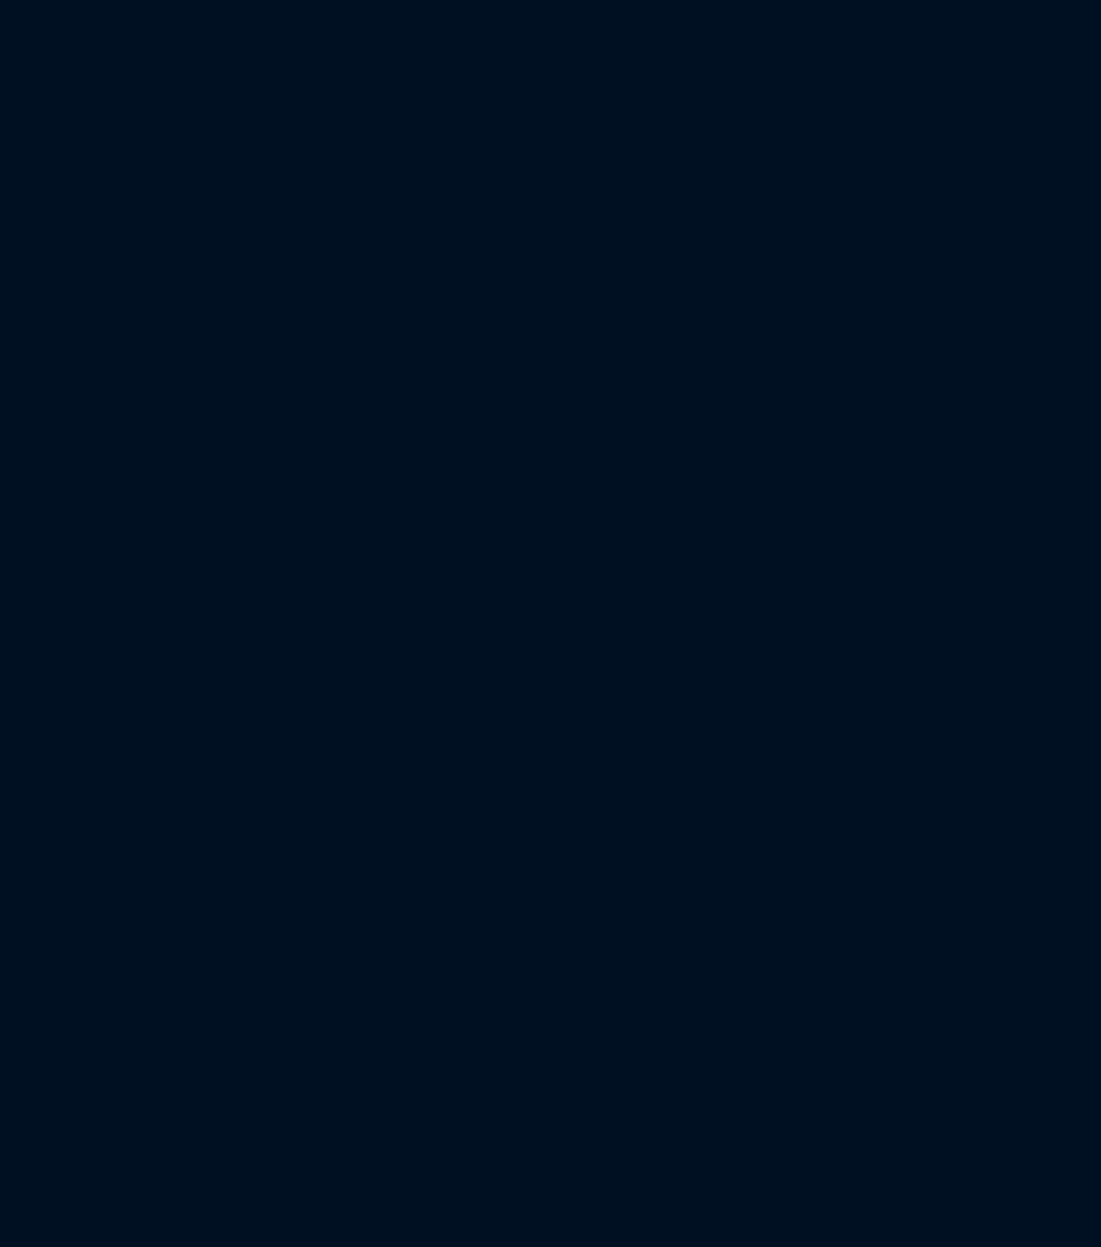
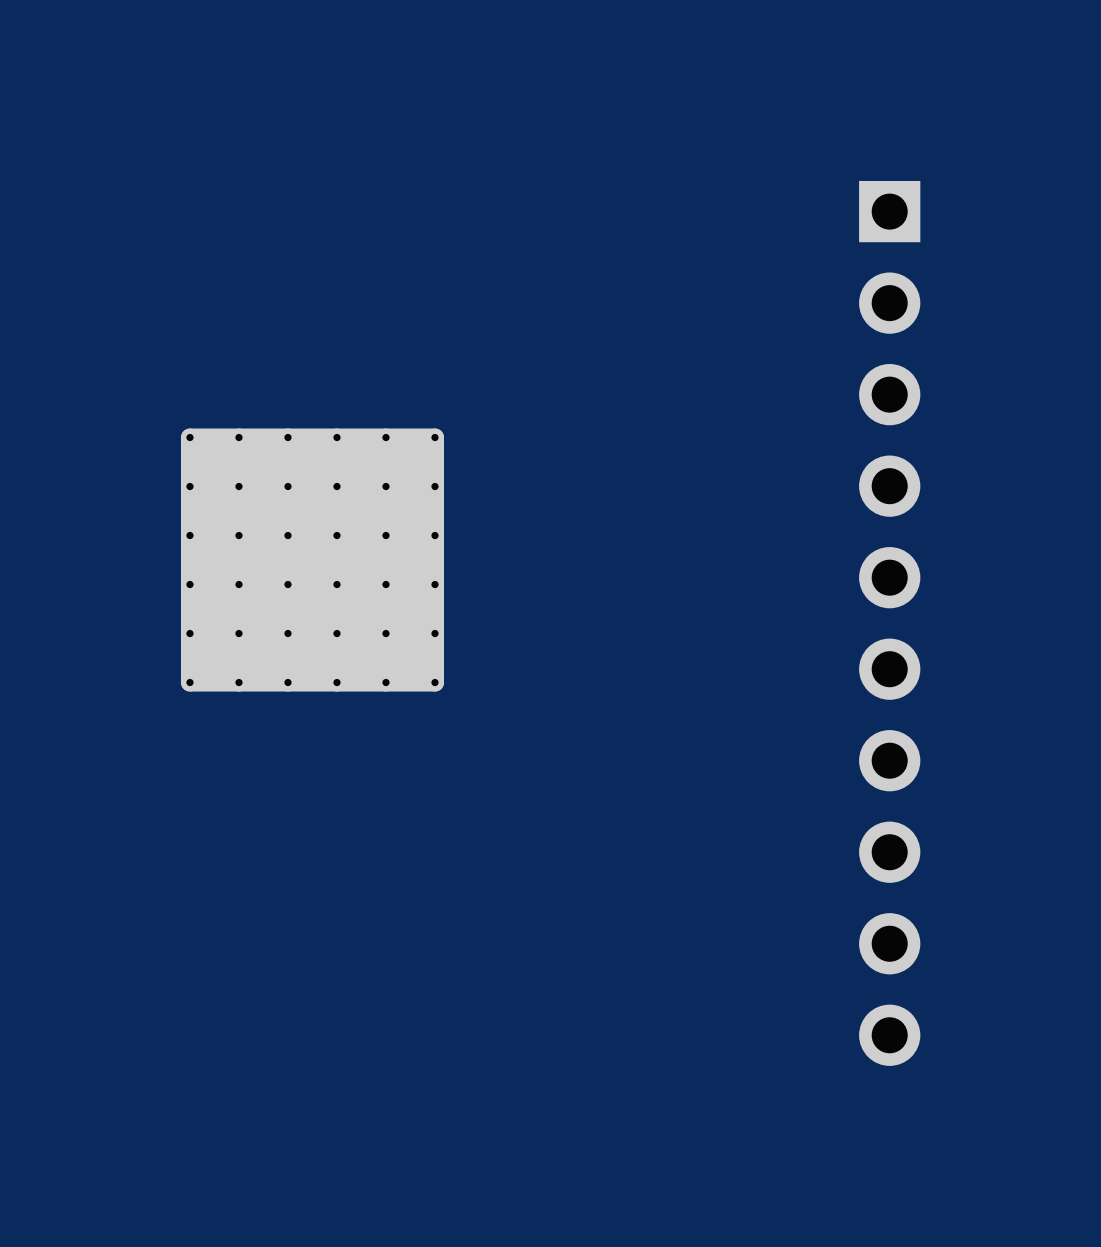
part: none -> (312, 560)
part: none -> (889, 623)

